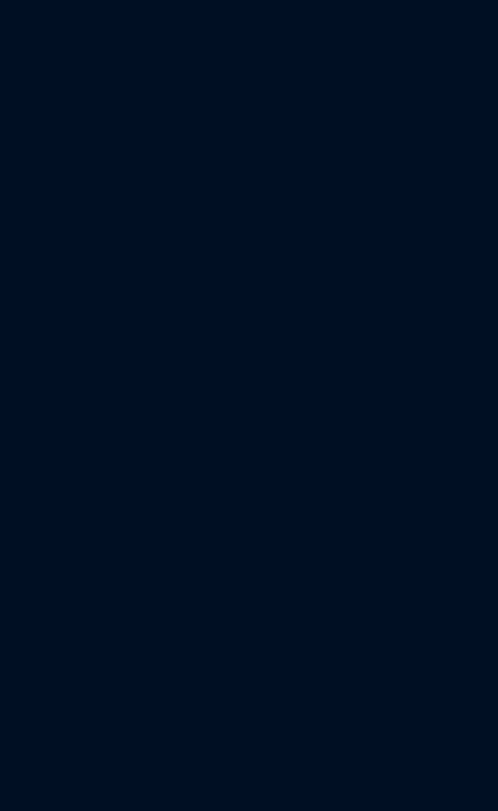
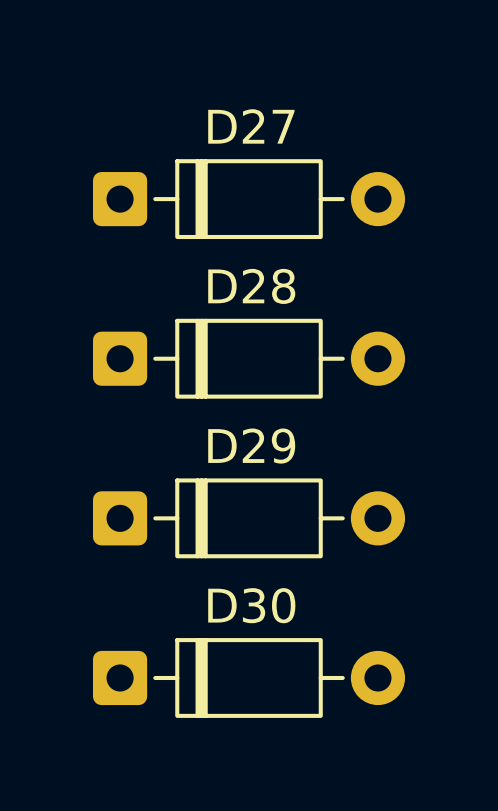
D27: none -> (249, 199)
D28: none -> (249, 358)
D29: none -> (249, 518)
D30: none -> (249, 677)

